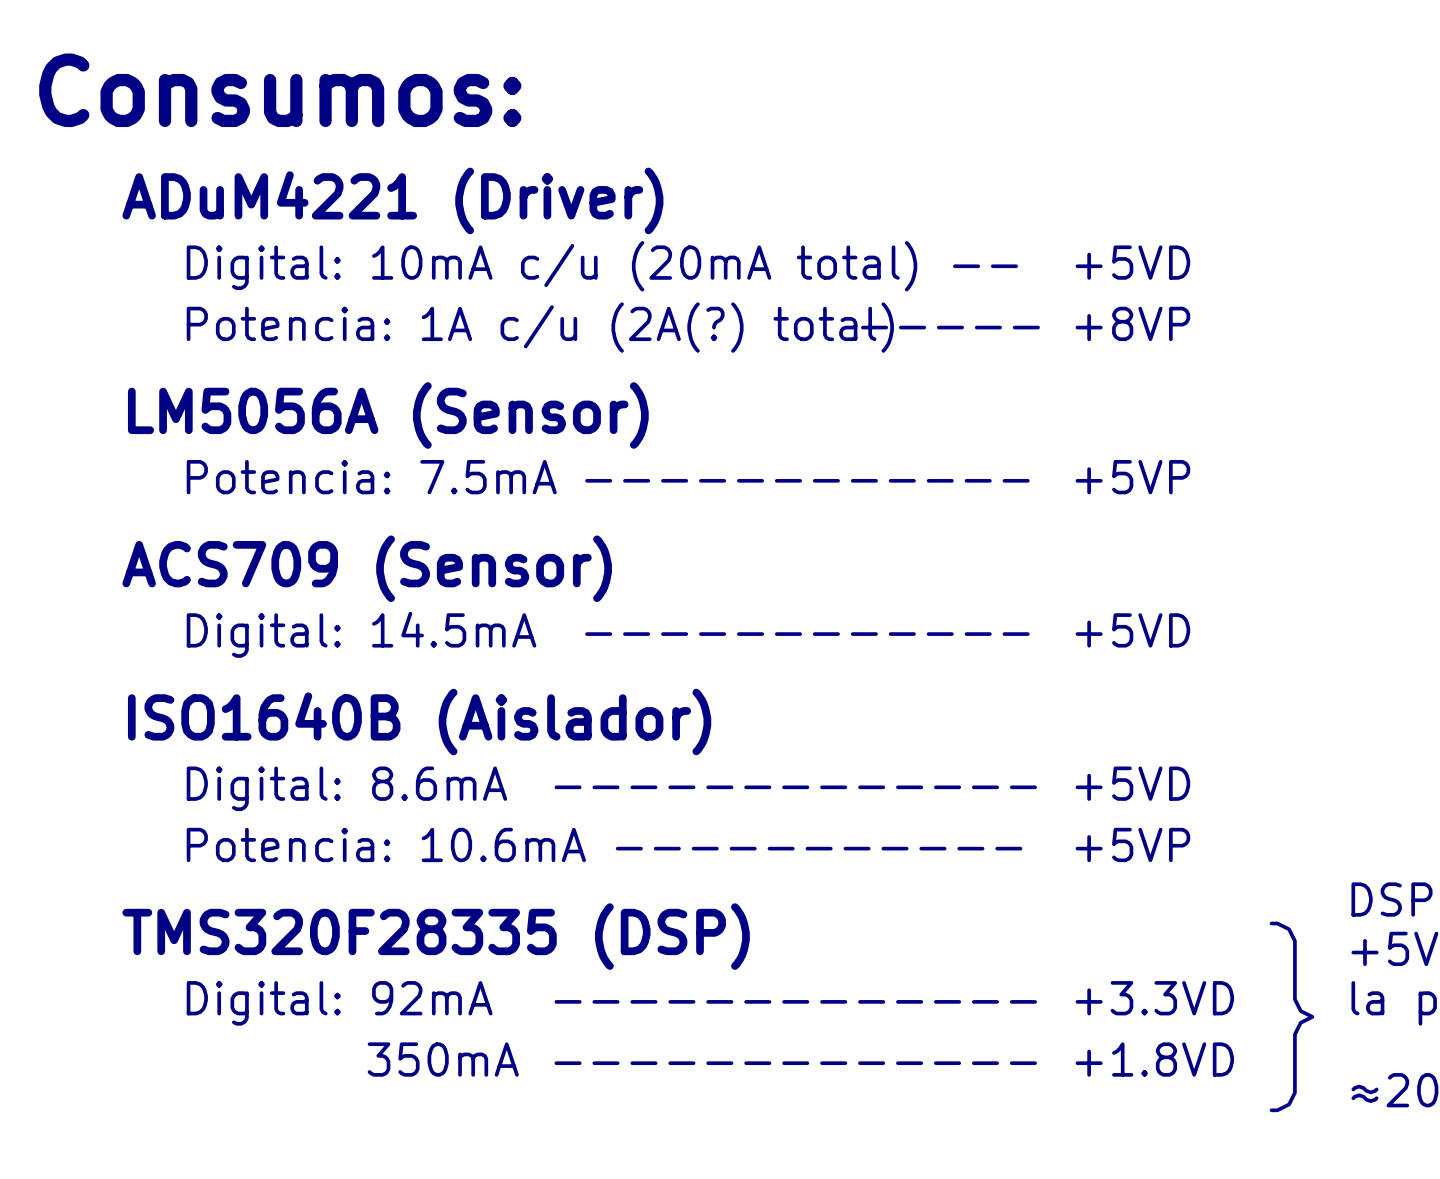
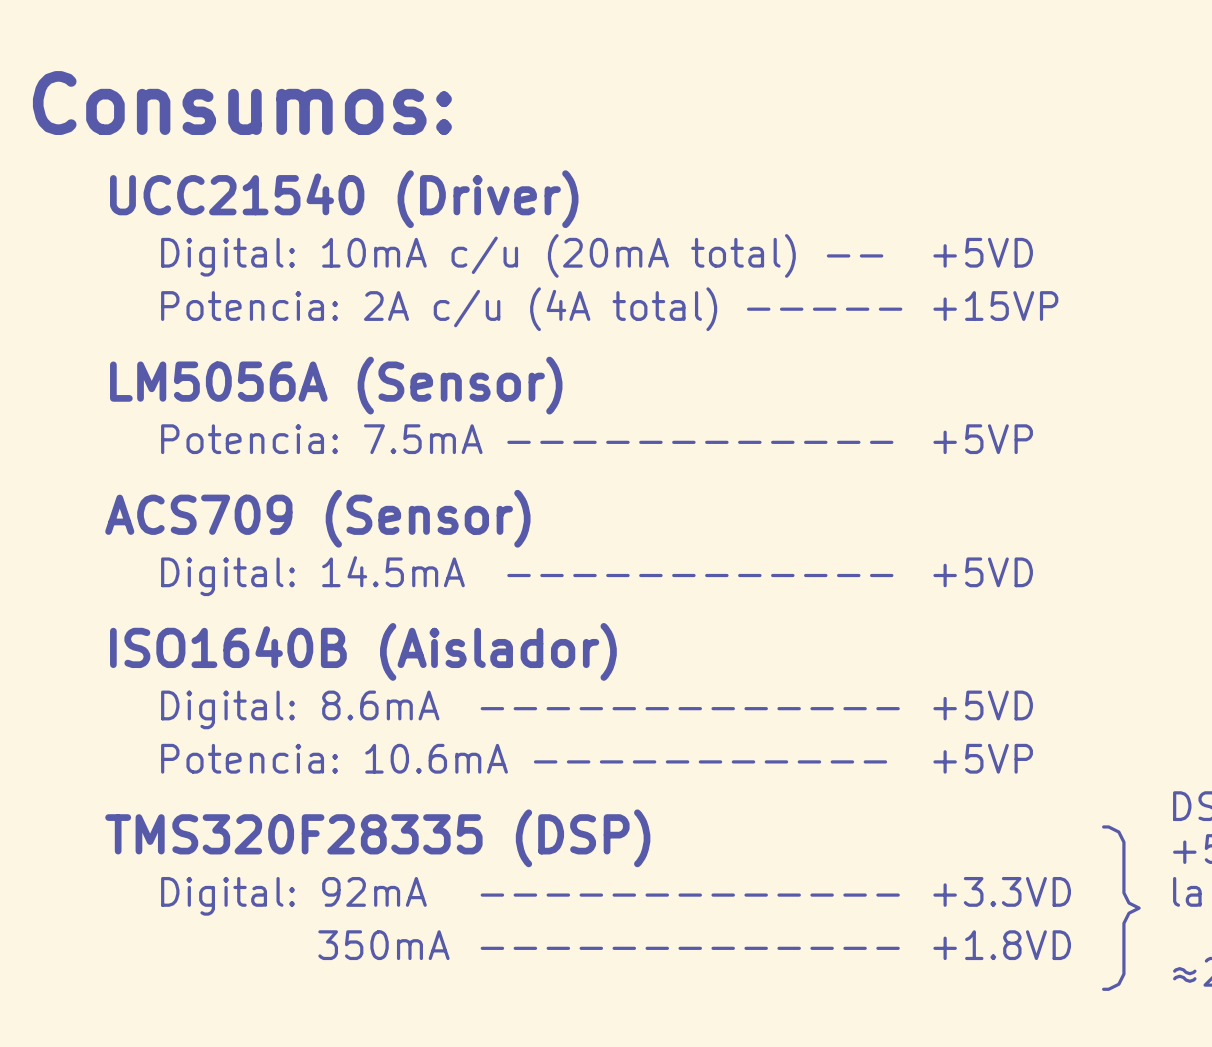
text: ADuM4221 (Driver) (392, 200) -> UCC21540 (Driver) (344, 199)
text: +8VP (1132, 323) -> +15VP (995, 306)
text: Potencia: 1A c/u (2A(?) total) (540, 327) -> Potencia: 2A c/u (4A total) (439, 309)

